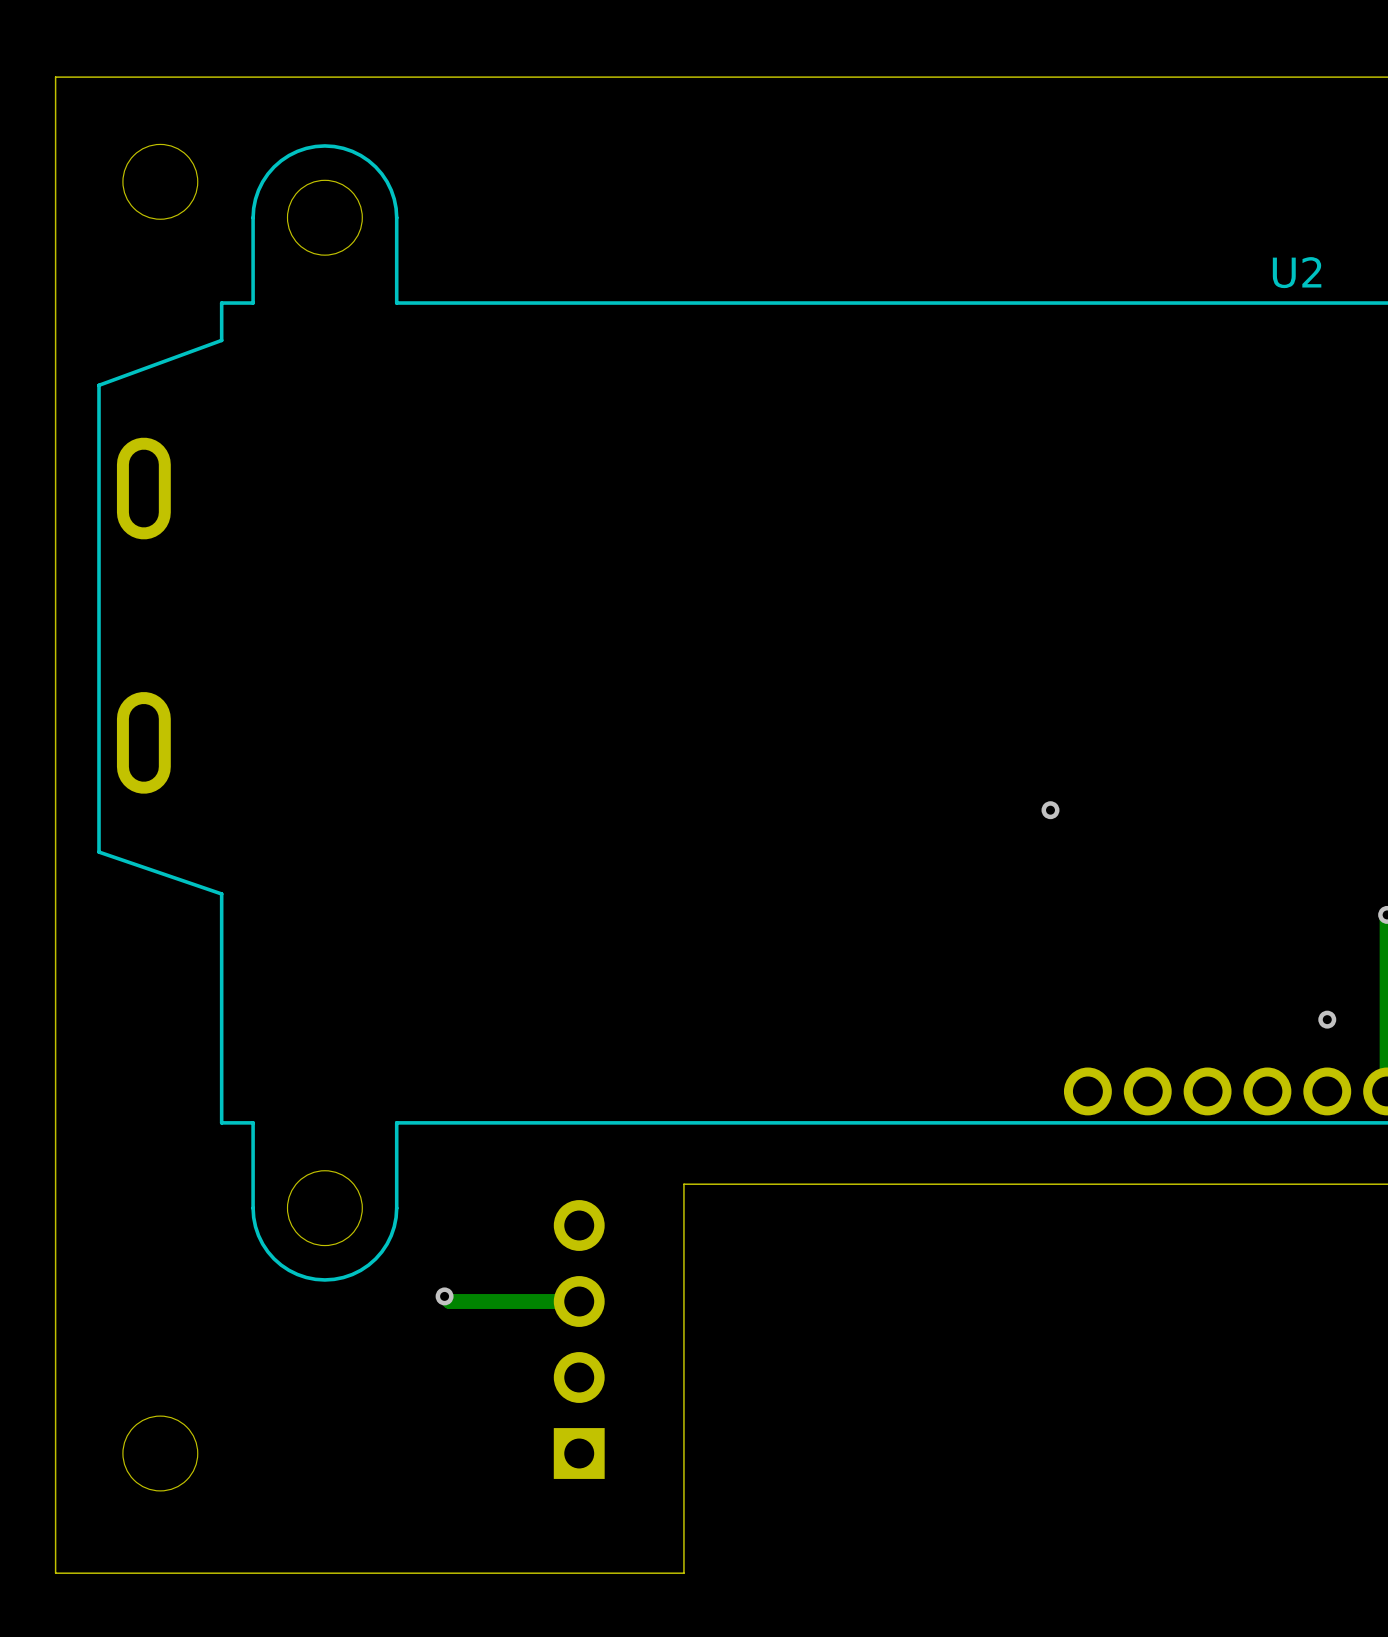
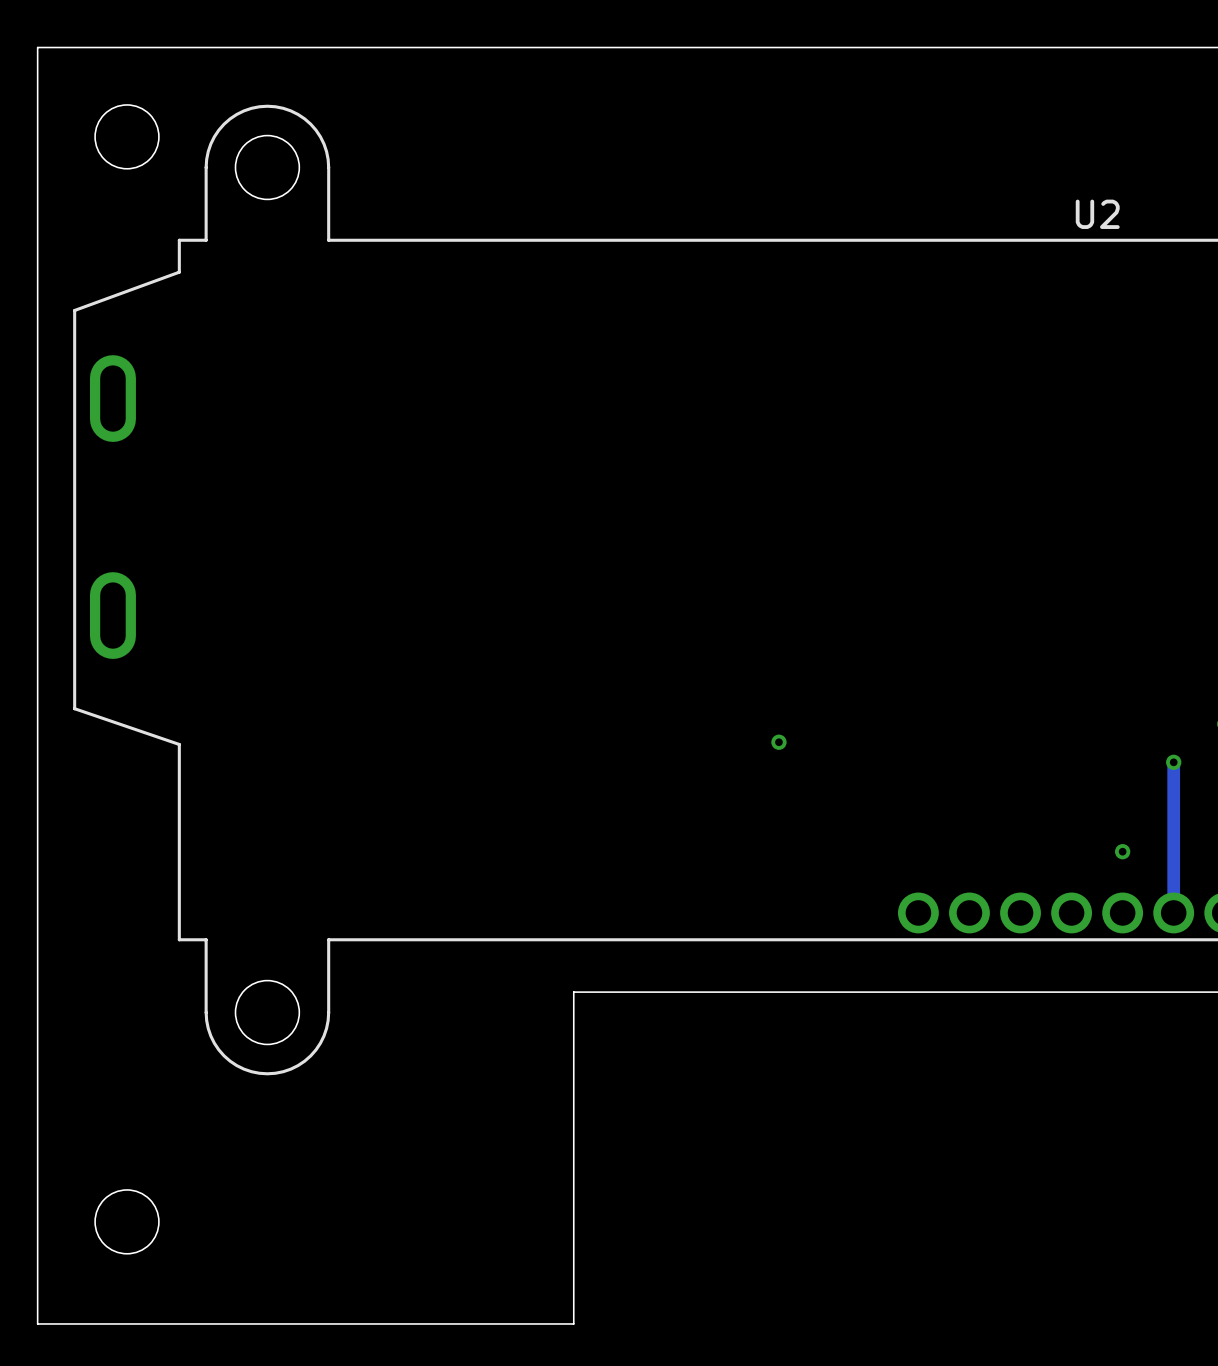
via position: (1050, 810) -> (778, 742)
track: (444, 1296) (449, 1301) (579, 1301) -> none
via: (444, 1296) -> none
part: (579, 1339) -> none

